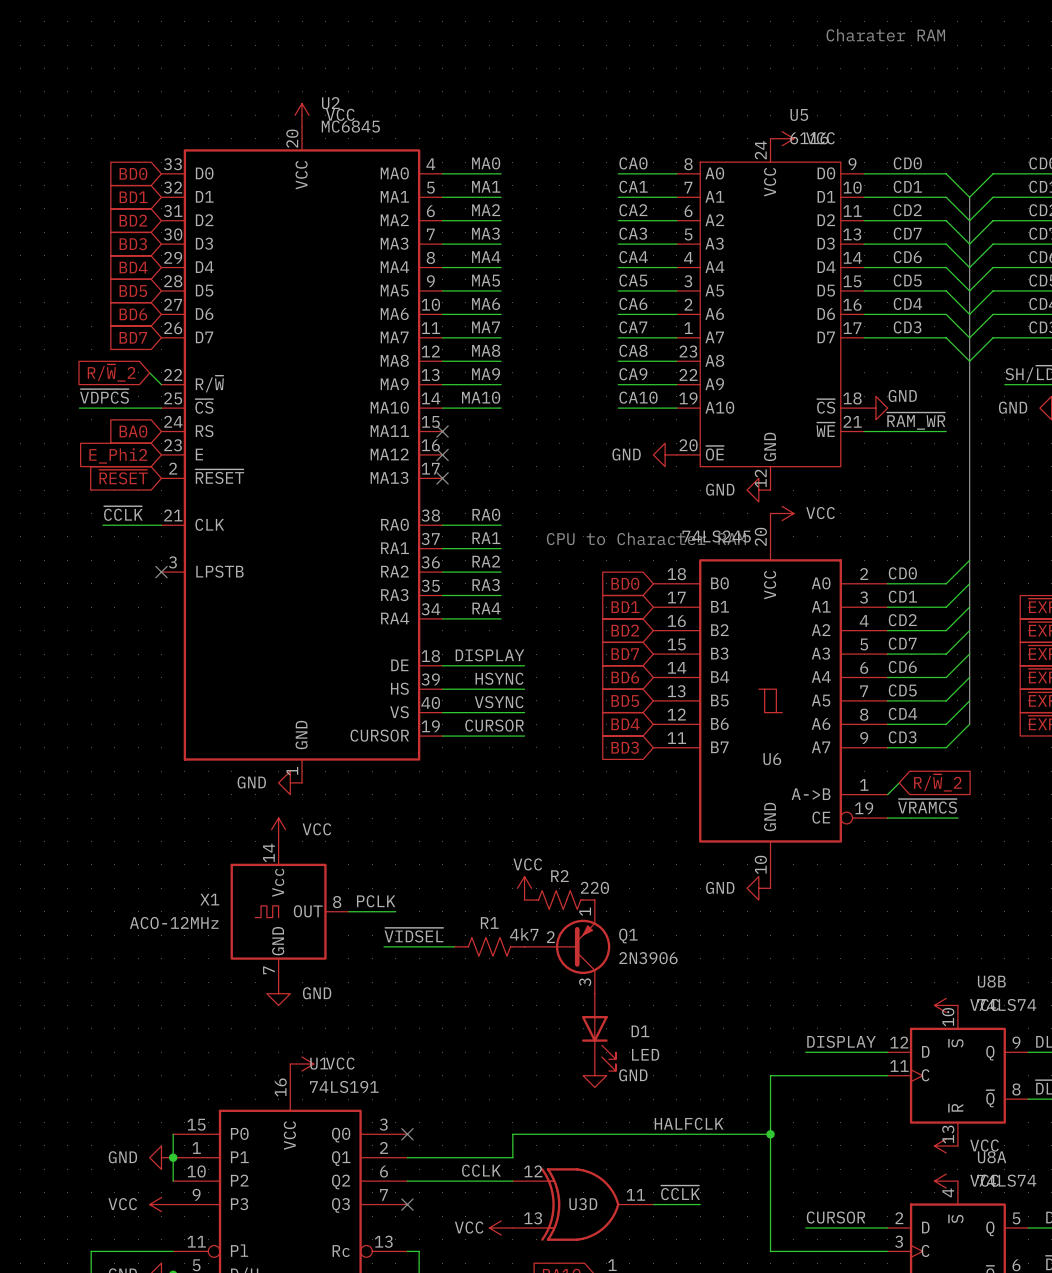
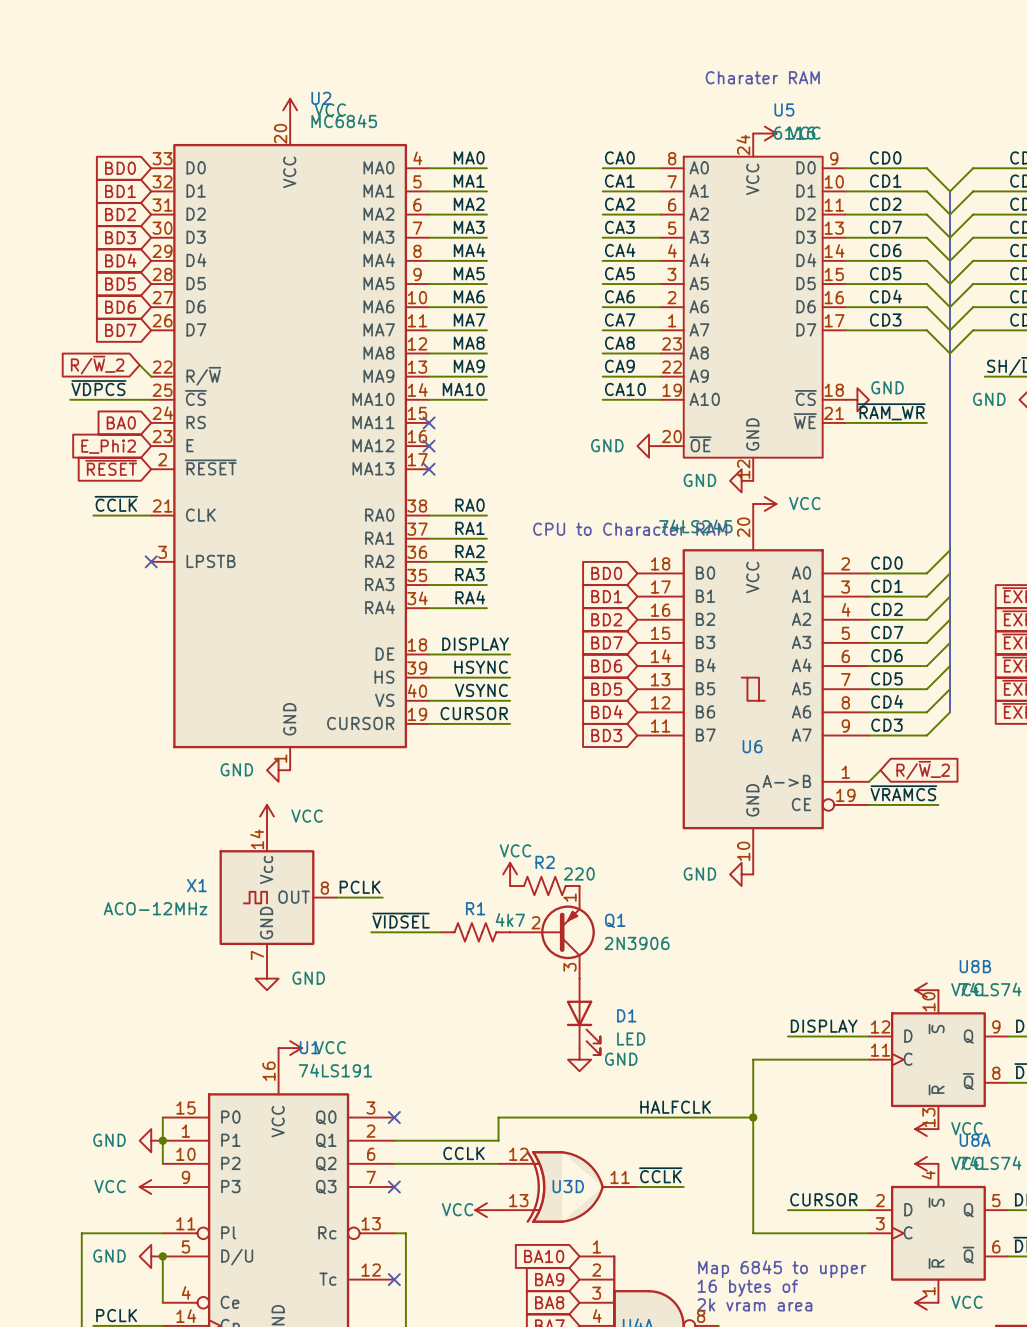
text position: Charater RAM (885, 35) -> Charater RAM (762, 77)

